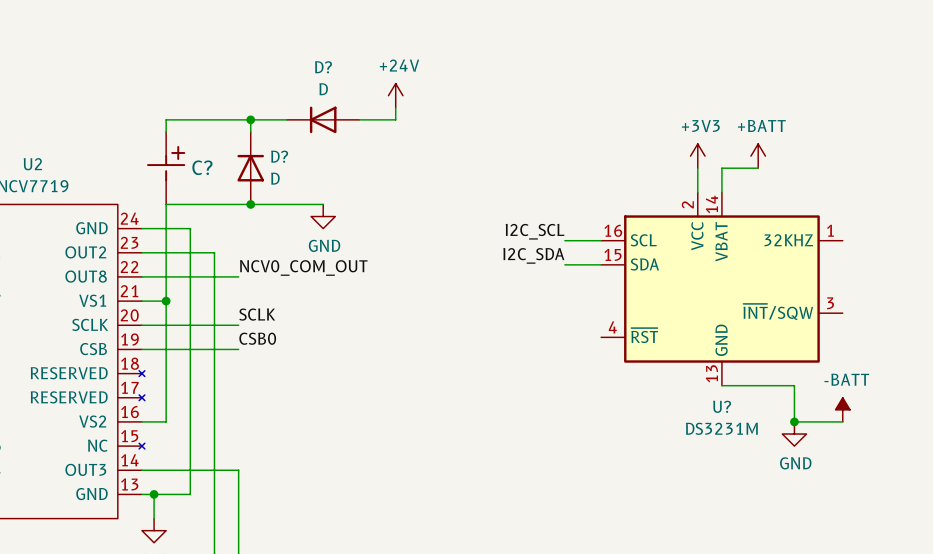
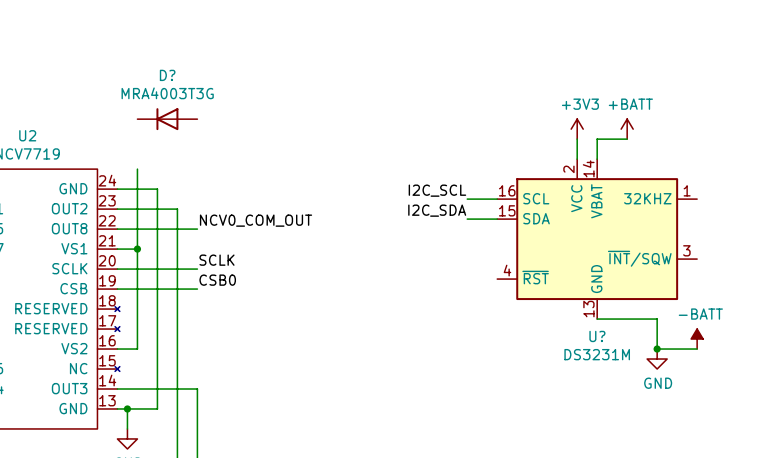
power symbol: +24V (395, 95) -> none
wire: (395, 107) (395, 119) (359, 119) -> none
wire: (250, 119) (250, 131) -> none
junction: (250, 119) -> none
wire: (286, 119) (166, 119) (166, 131) -> none
D?: D (323, 119) -> none
D?: none -> MRA4003T3G (167, 119)
C?: (166, 168) -> none
D?: D (250, 168) -> none
wire: (166, 204) (323, 204) -> none
junction: (250, 204) -> none
power symbol: GND (323, 216) -> none

